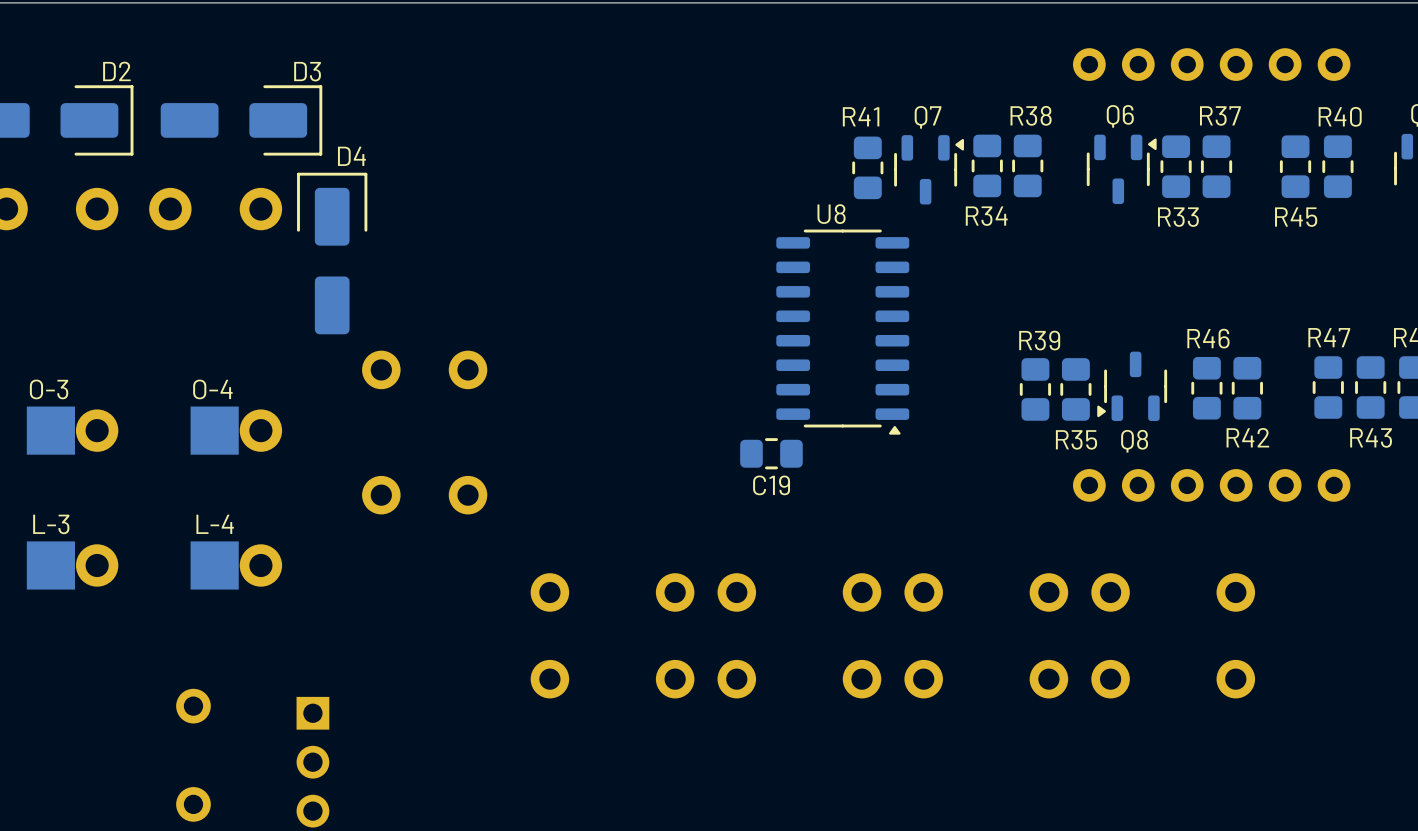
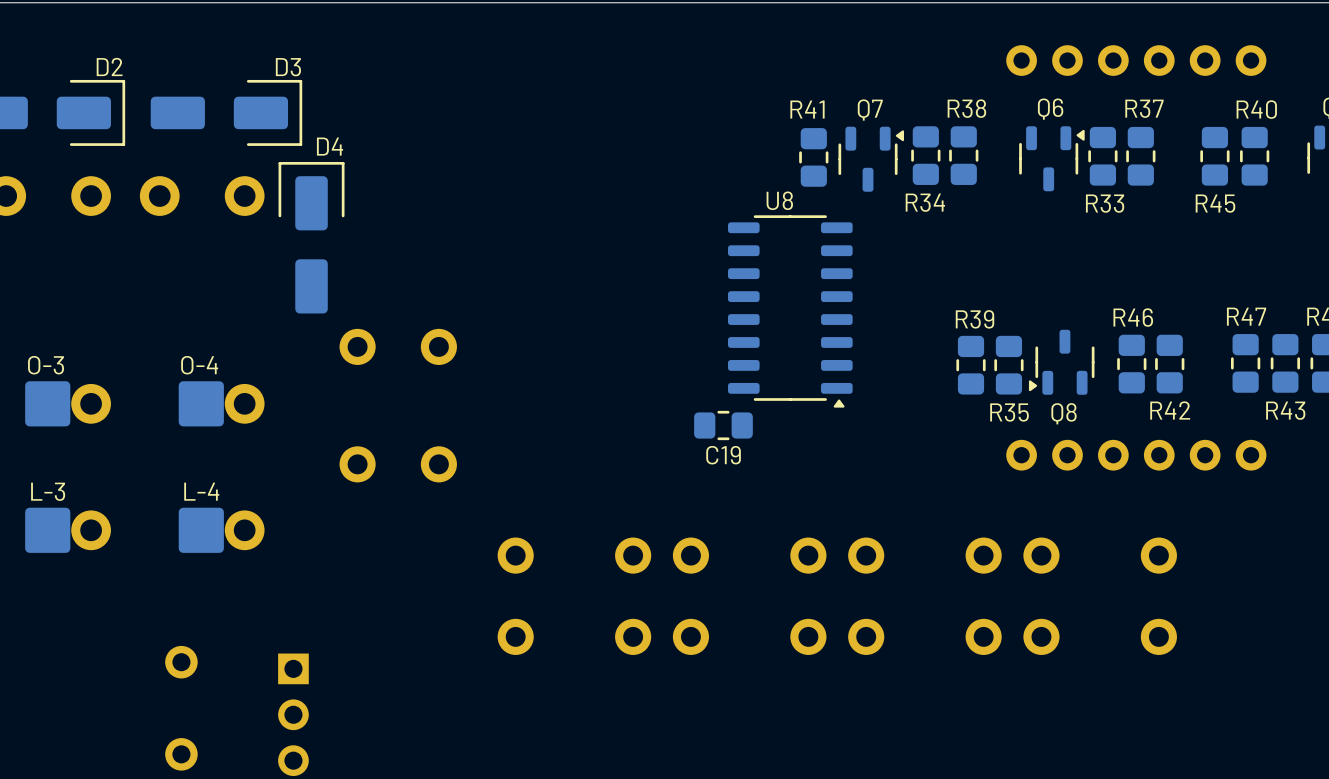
part footprint: [26, 406, 75, 455] -> [25, 381, 71, 427]
part footprint: [190, 406, 239, 455] -> [178, 381, 224, 427]
part footprint: [26, 541, 75, 590] -> [25, 507, 71, 553]
part footprint: [190, 541, 239, 590] -> [178, 507, 224, 553]

